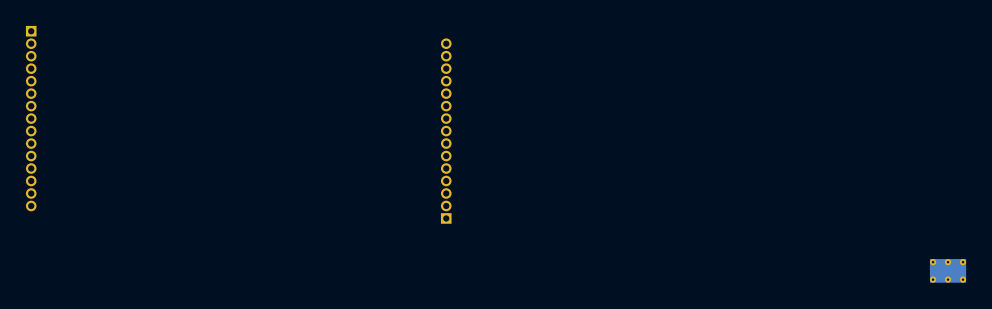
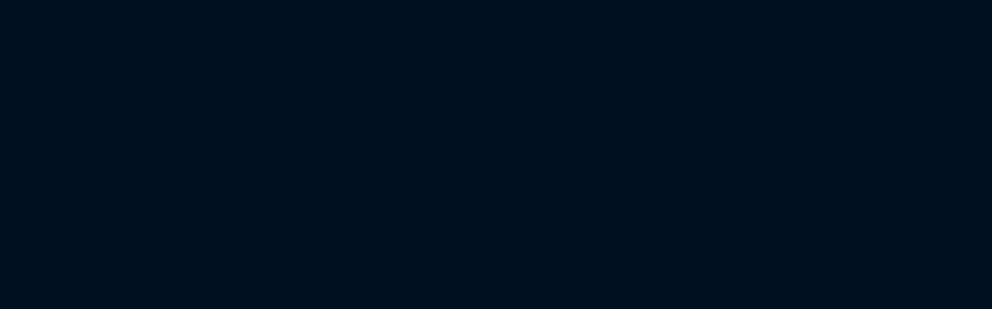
part: (31, 118) -> none
part: (446, 131) -> none
part: (948, 270) -> none

